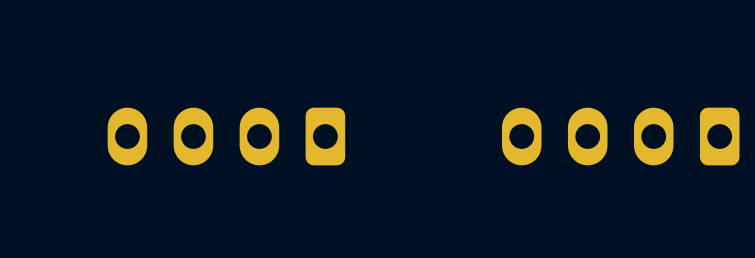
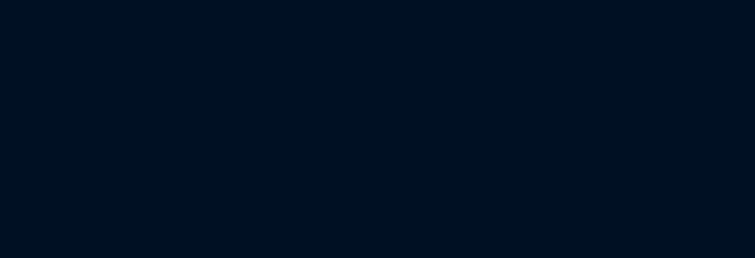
part: (226, 136) -> none
part: (620, 136) -> none

